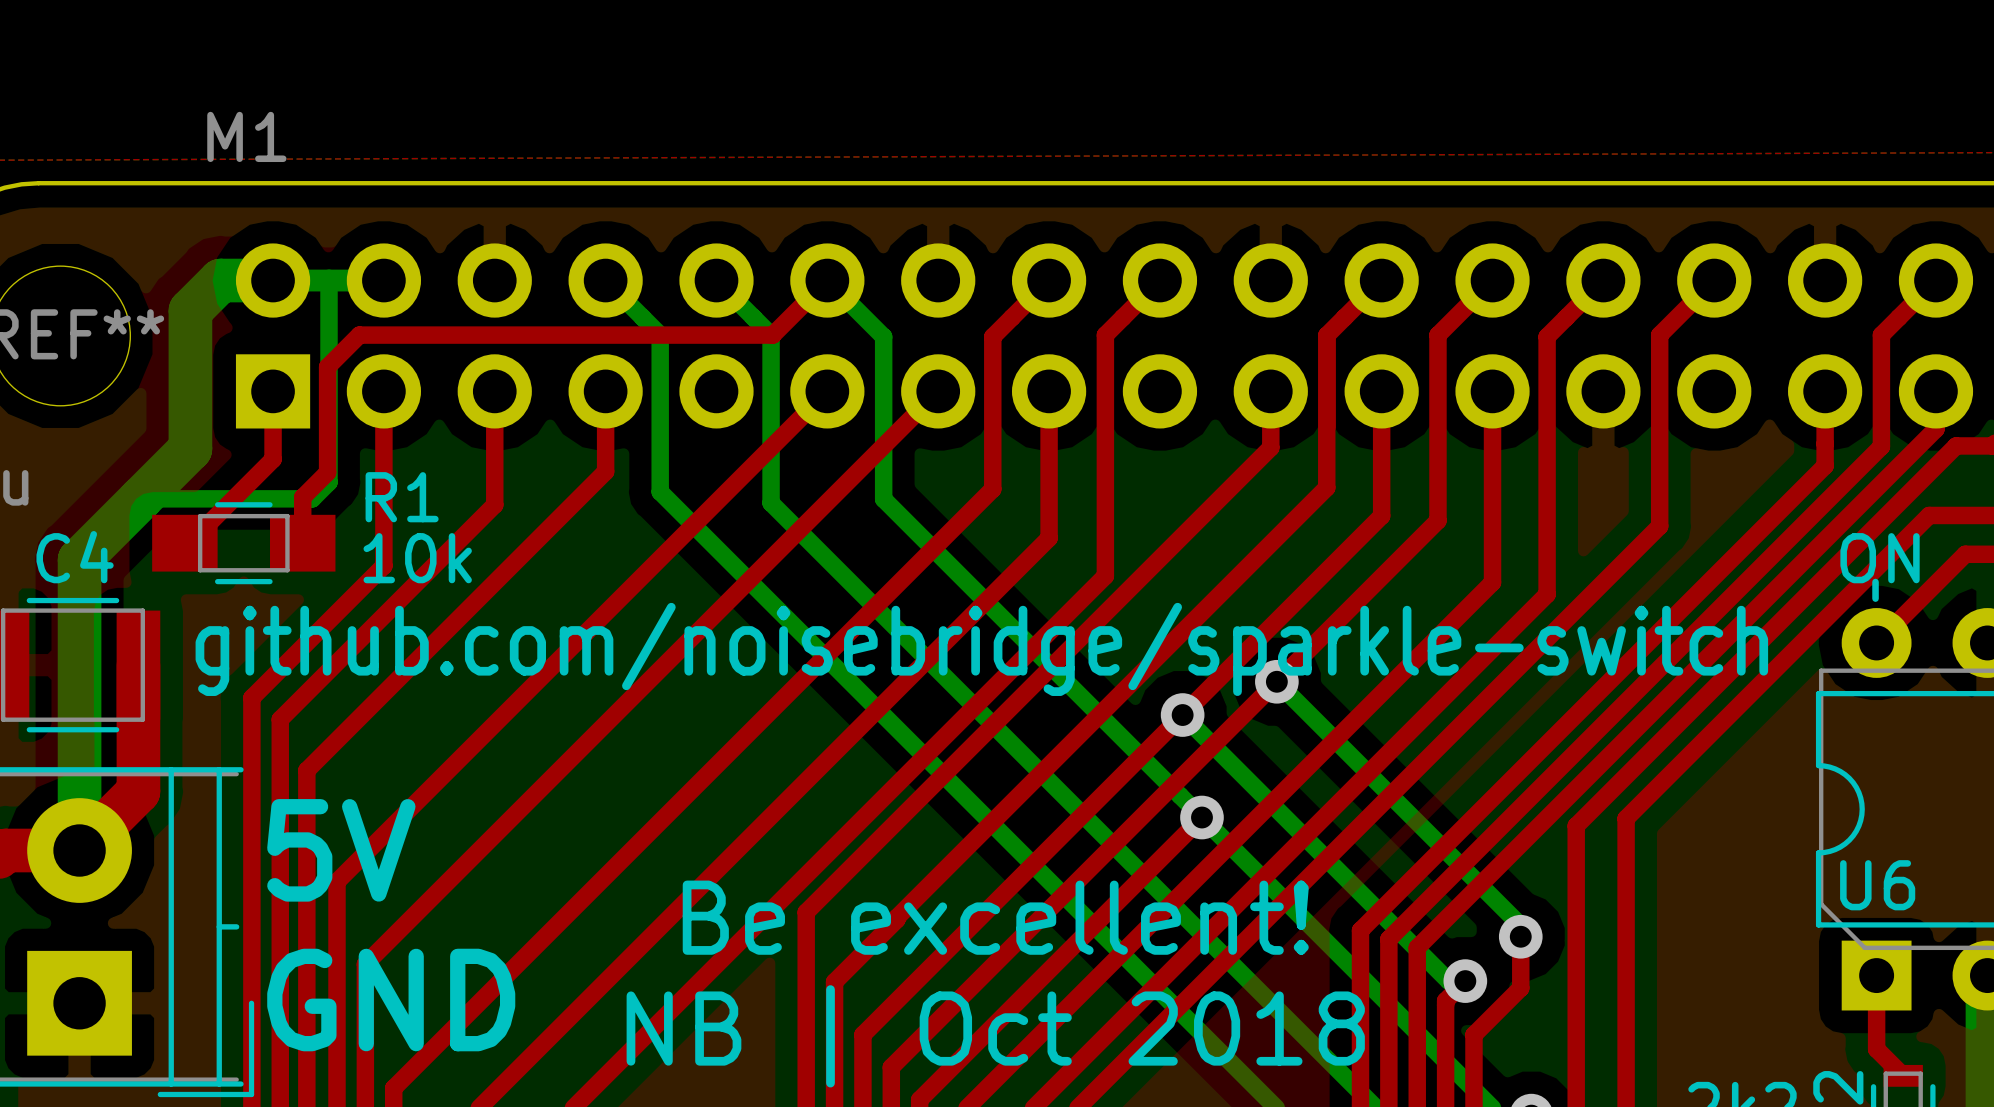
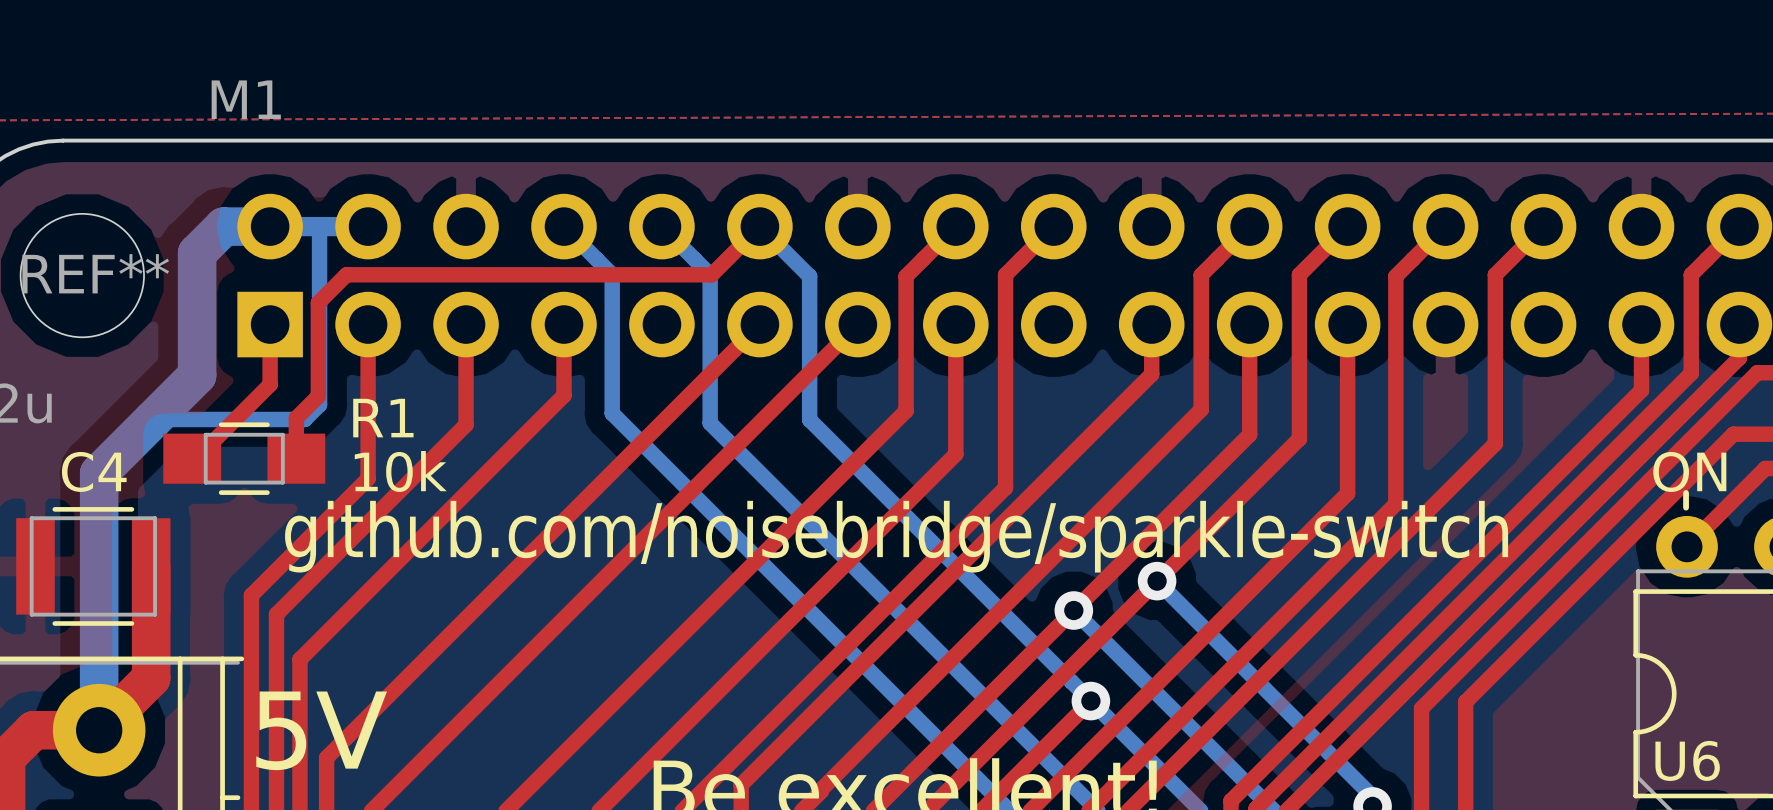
text position: github.com/noisebridge/sparkle-switch (981, 649) -> github.com/noisebridge/sparkle-switch (896, 536)

